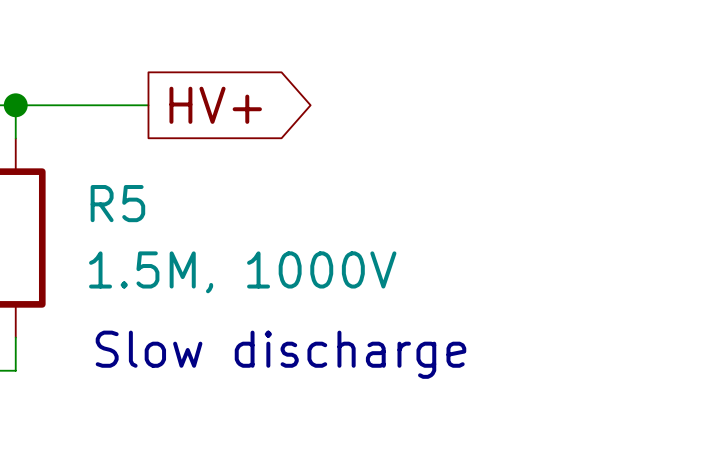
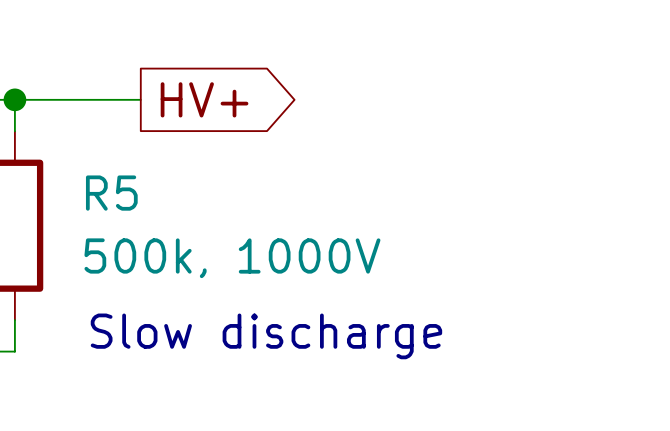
R5 value: 1.5M, 1000V (242, 272) -> 500k, 1000V (232, 258)

